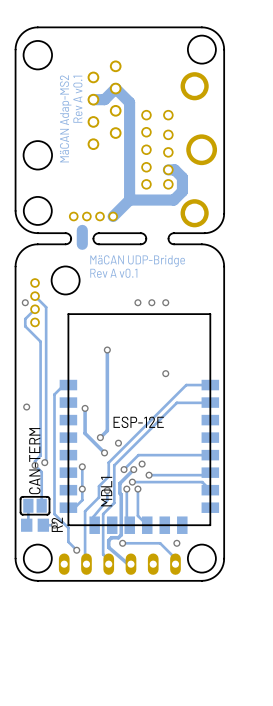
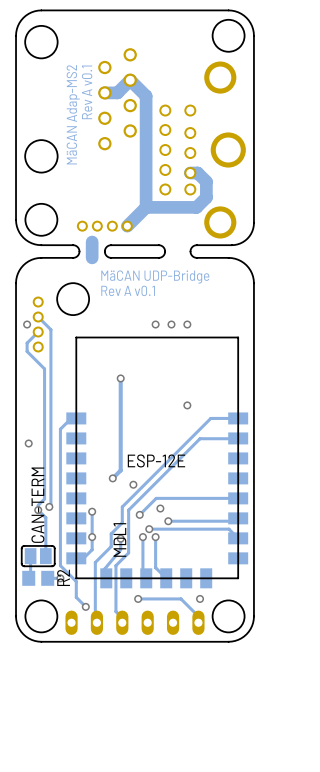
track: (85, 408) (85, 433) (104, 452) -> none
via: (85, 408) -> none
via: (104, 452) -> none
track: (133, 469) (119, 483) (121, 534) (108, 540) (108, 547) (128, 564) (130, 564) -> none
via: (133, 469) -> none

